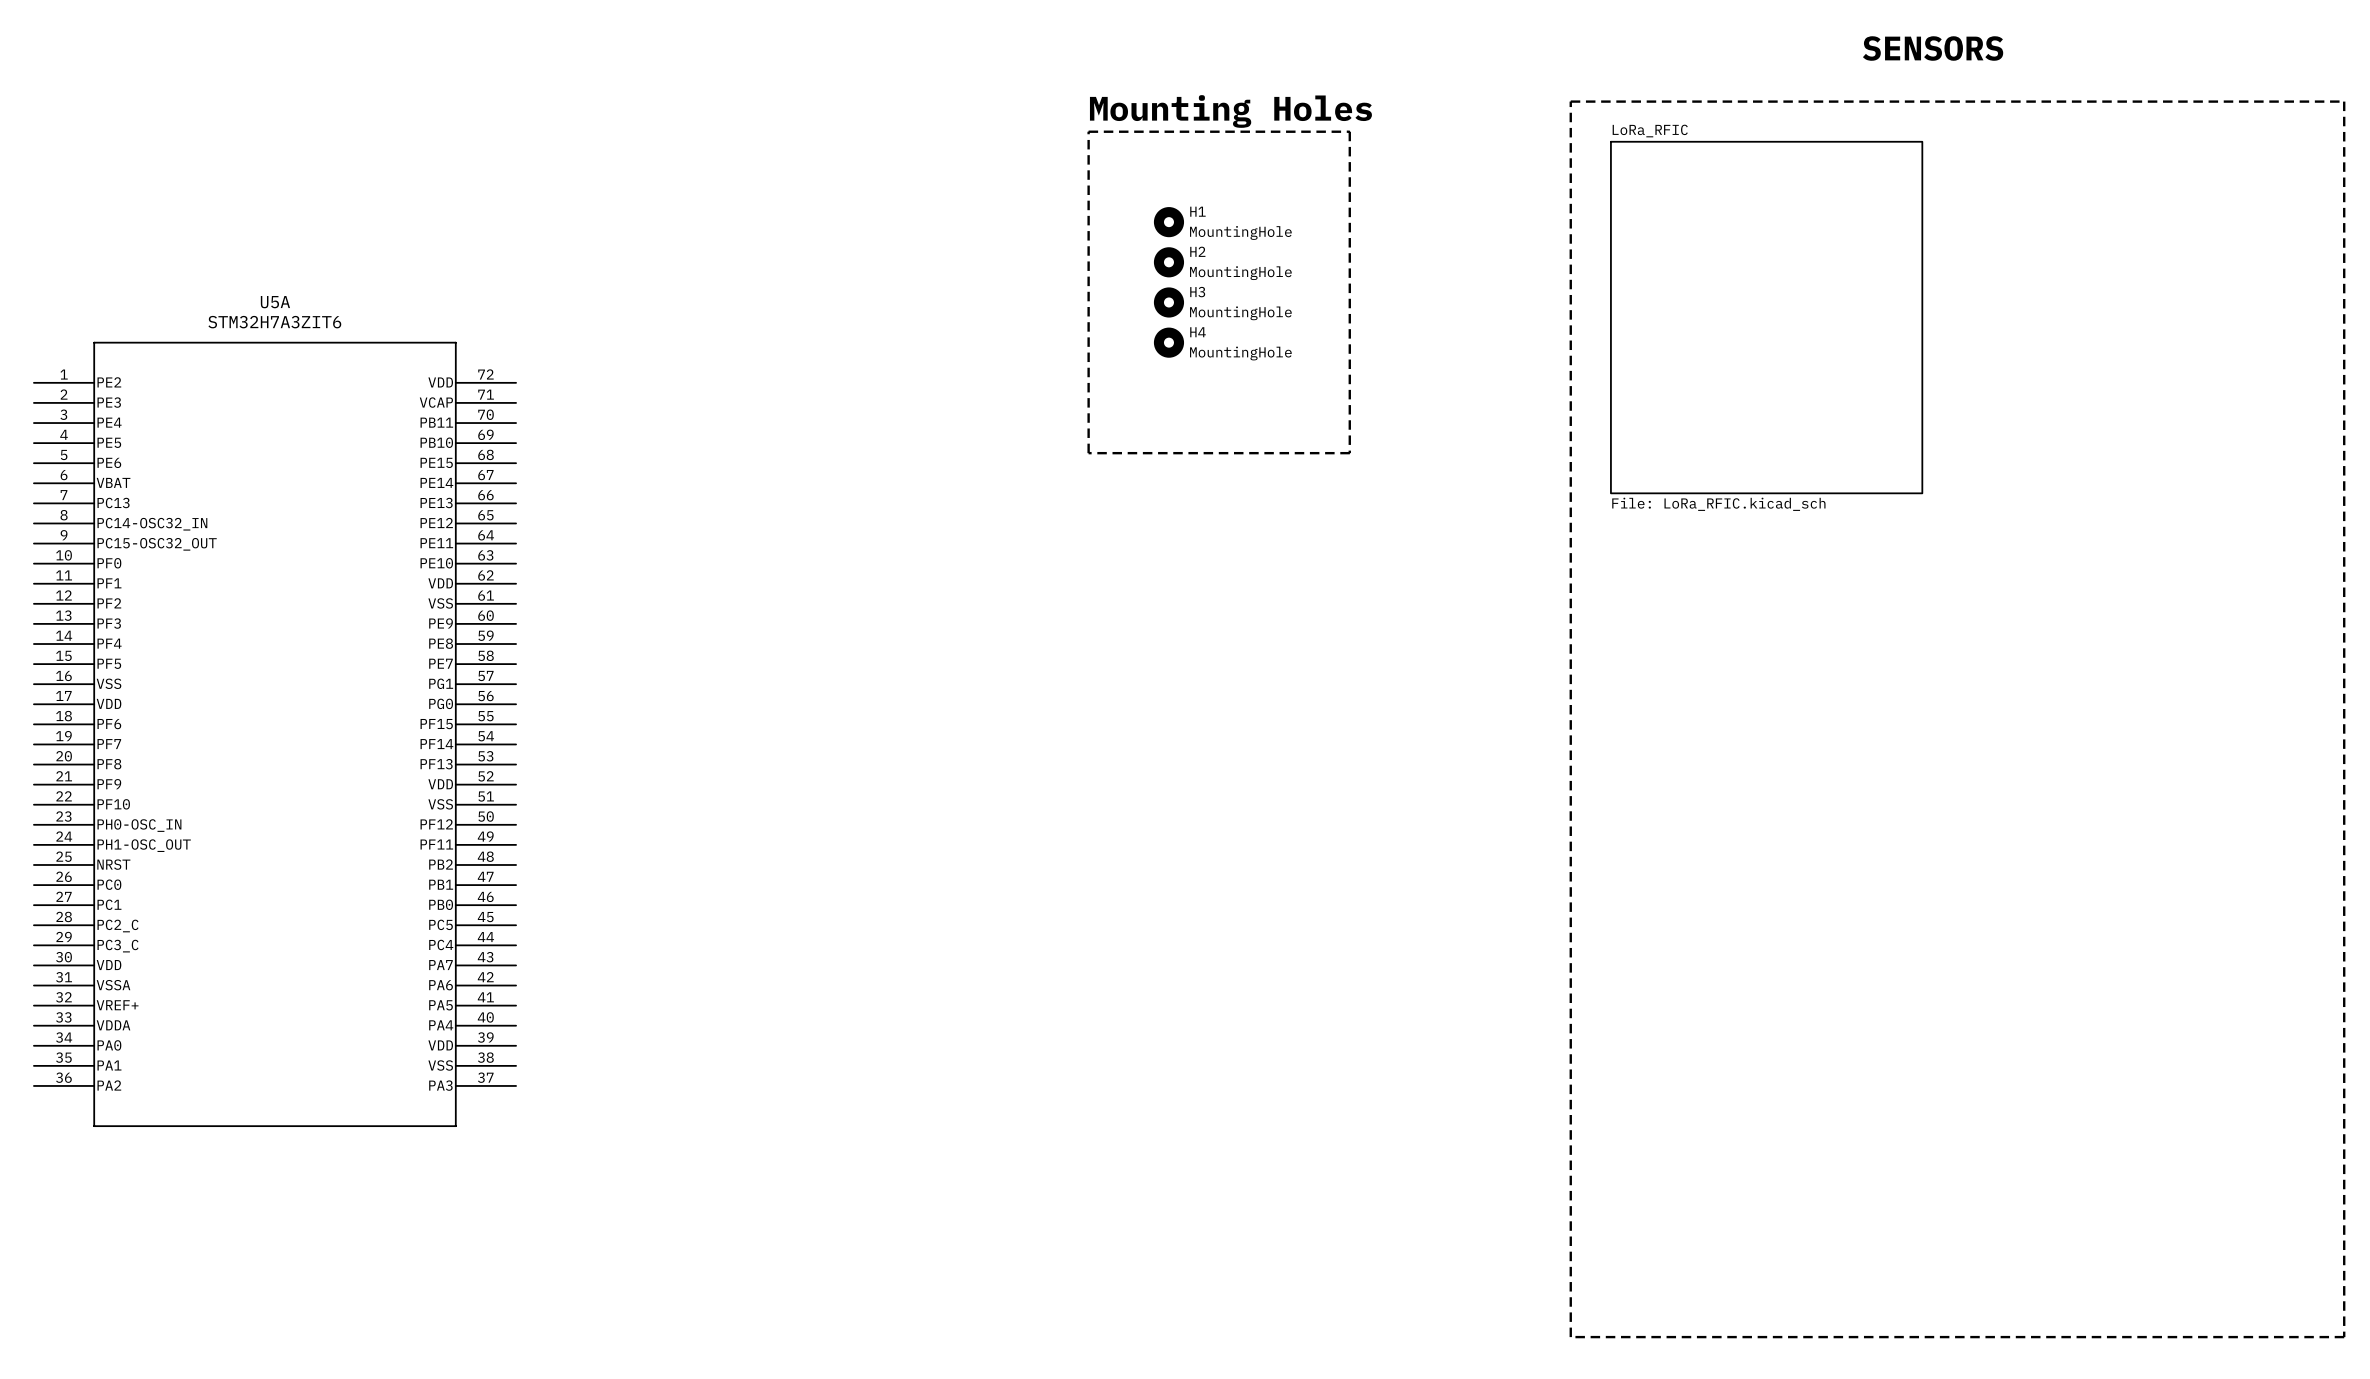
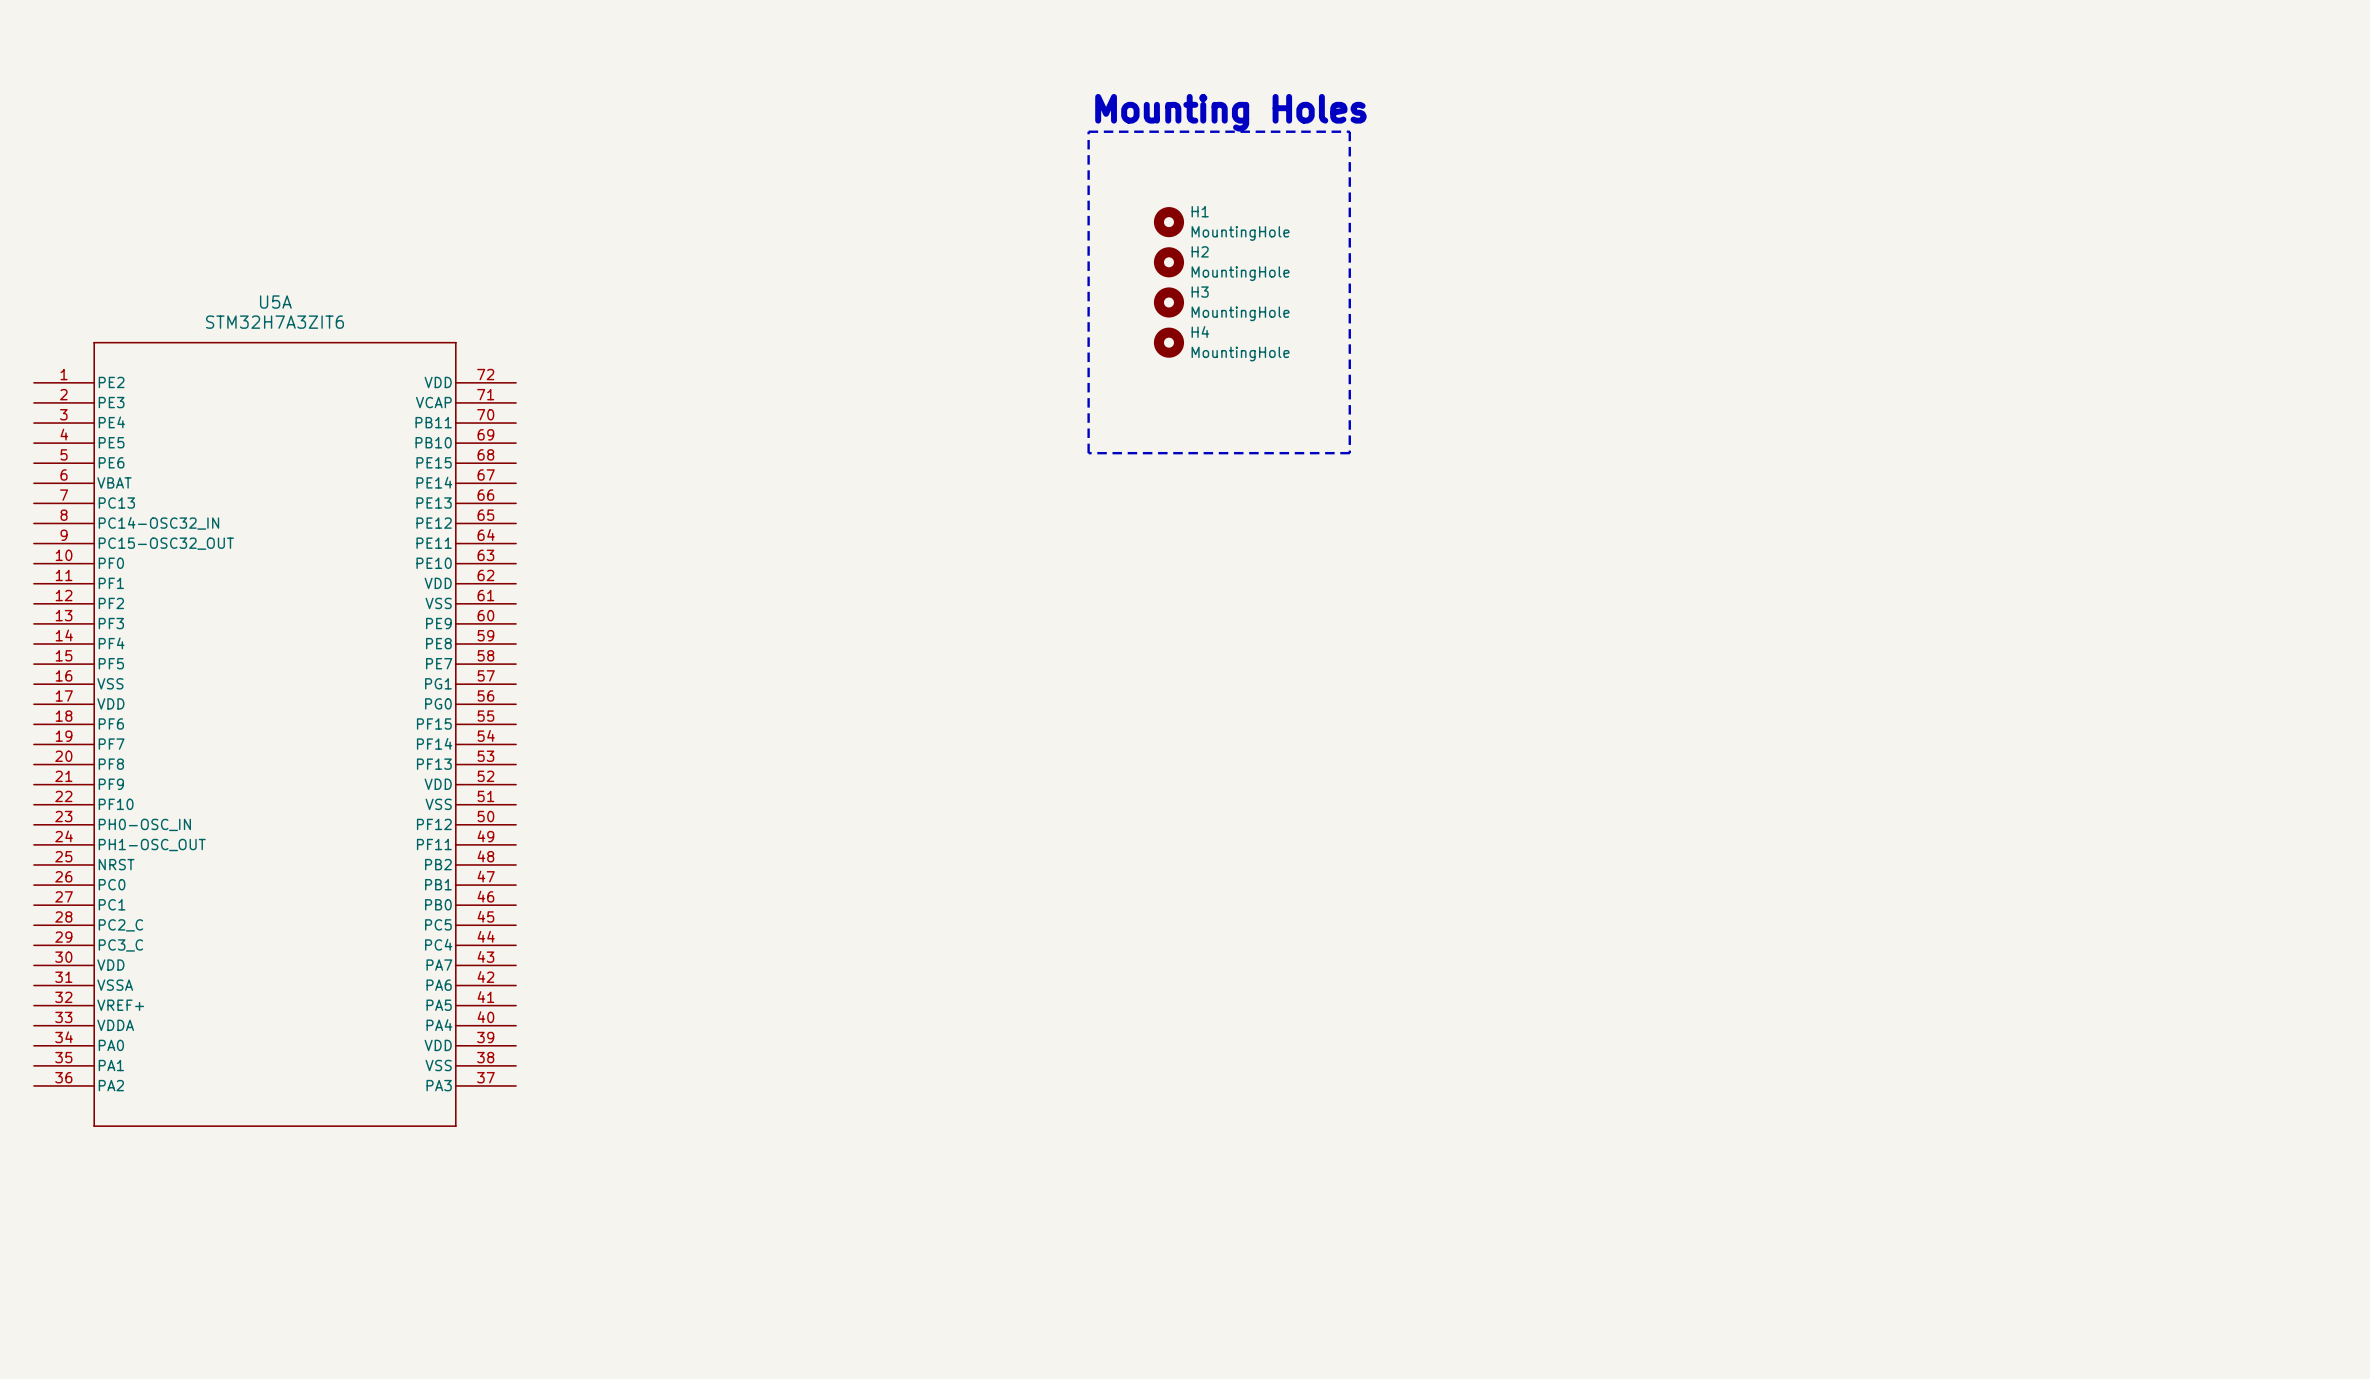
text: SENSORS (1933, 48) -> none
line: (1570, 101) (2344, 101) (2344, 1337) (1570, 1337) (1570, 101) -> none
sheet LoRa_RFIC: File: LoRa_RFIC.kicad_sch (1766, 317) -> none

